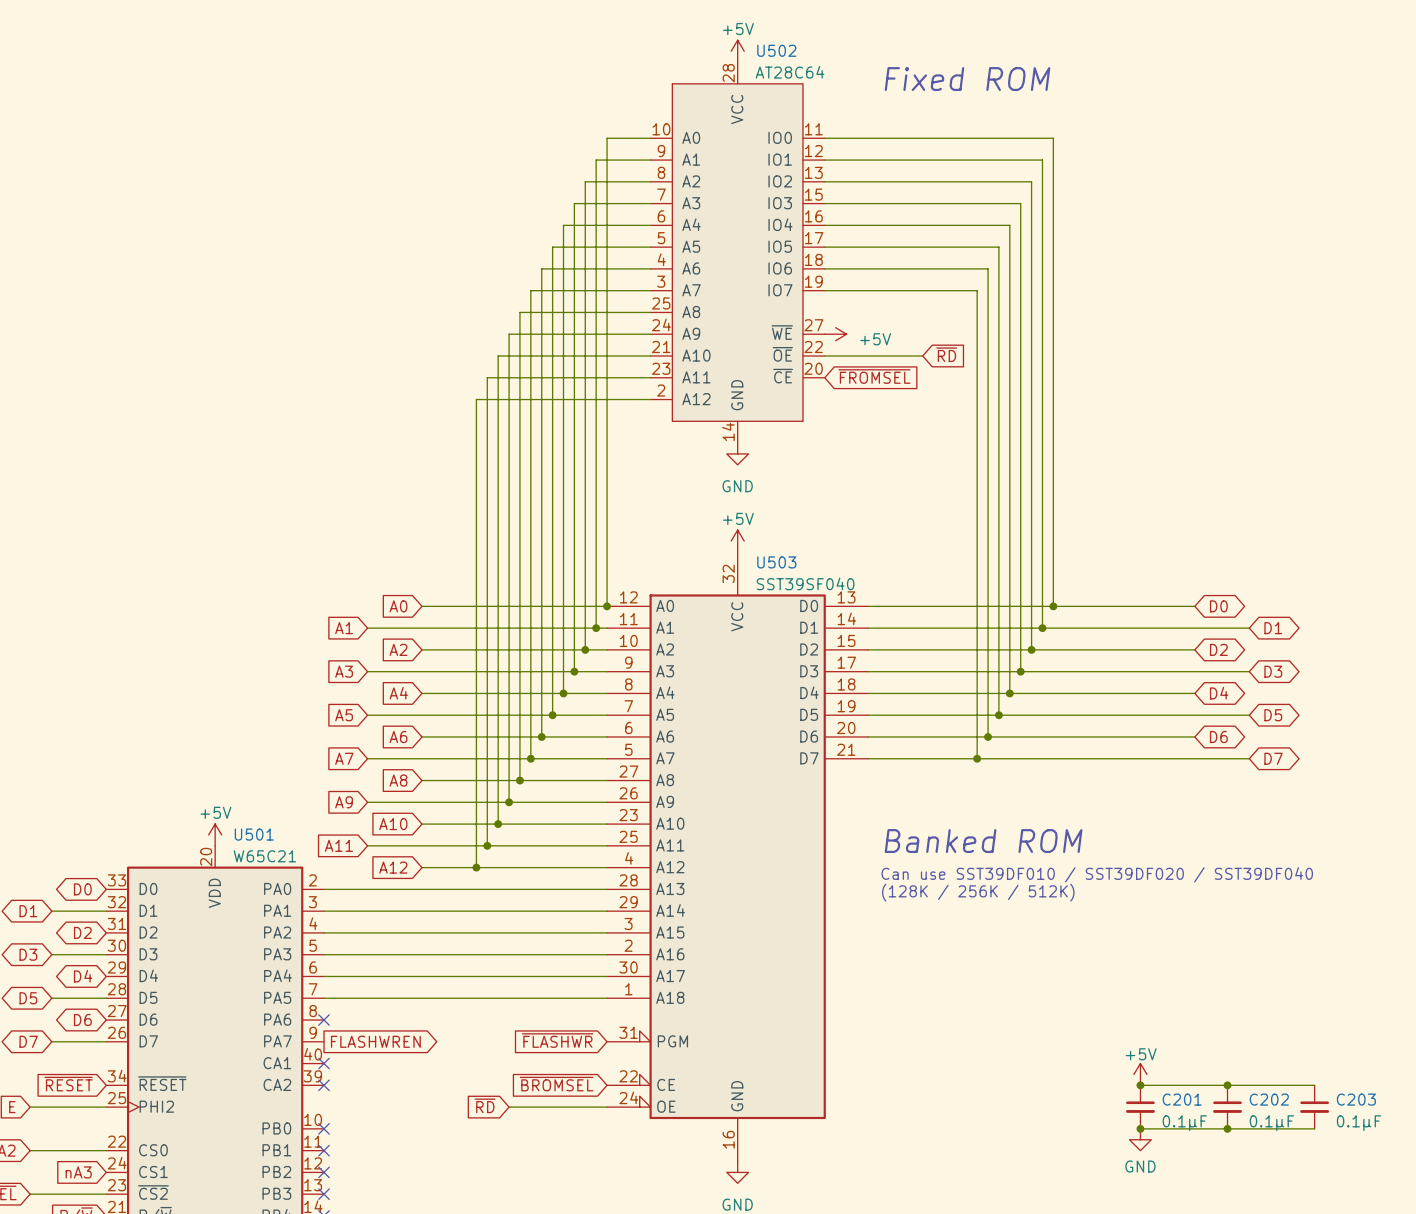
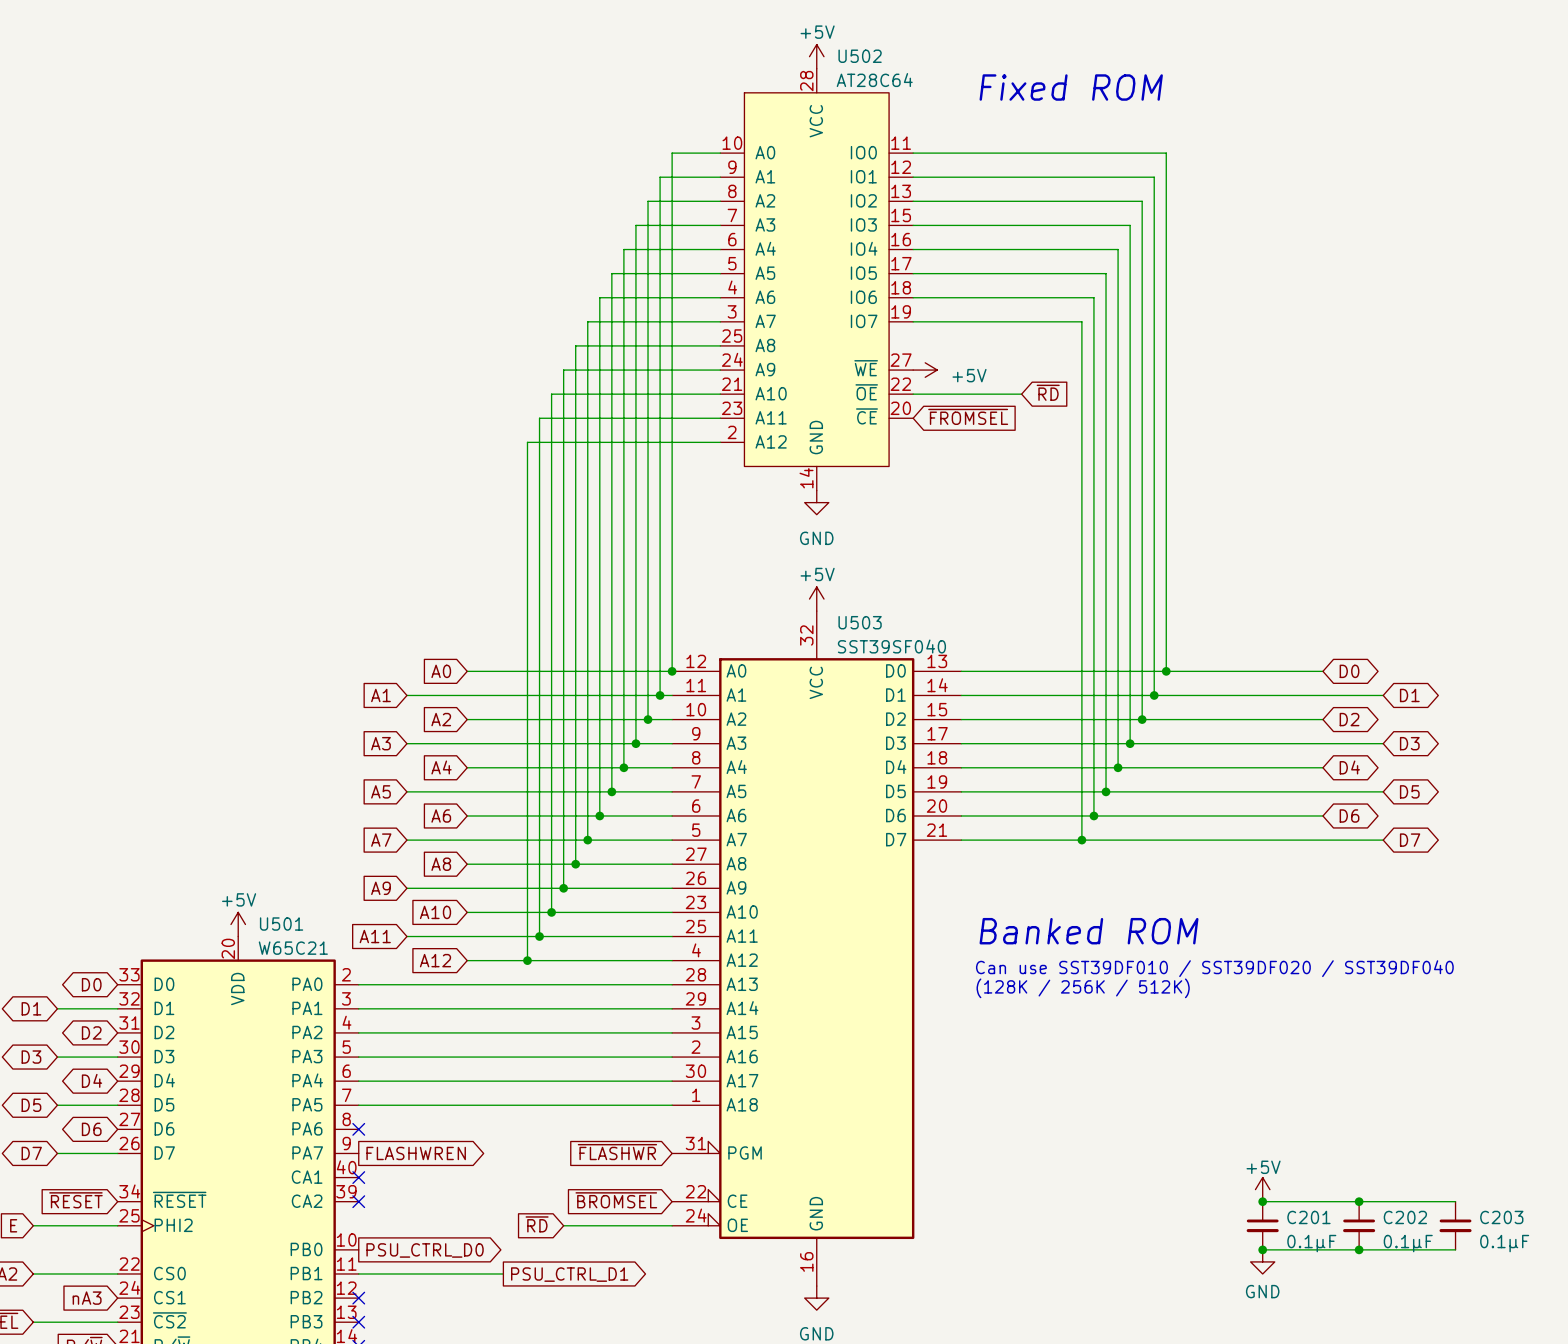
no-connect mark: (324, 1128) -> none
global label: none -> PSU_CTRL_D0 (425, 1250)
wire: none -> (358, 1273) (503, 1273)
no-connect mark: (324, 1150) -> none
global label: none -> PSU_CTRL_D1 (569, 1274)

